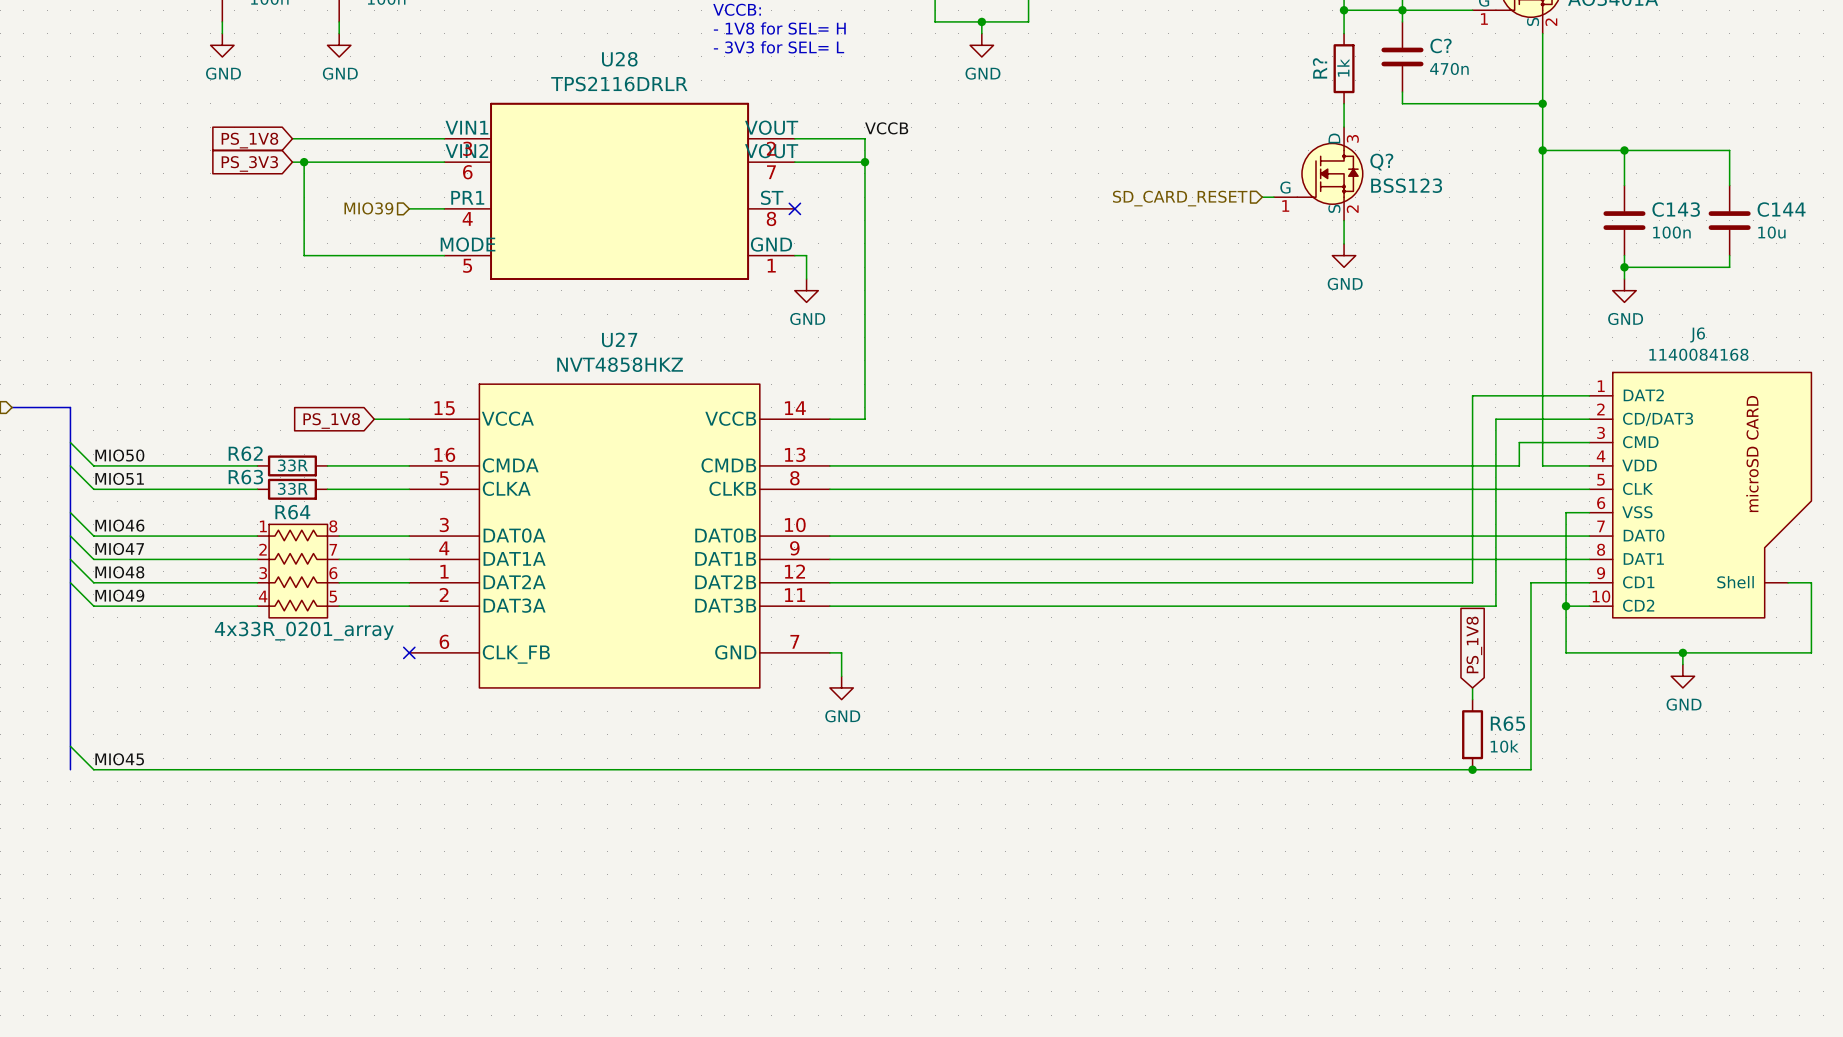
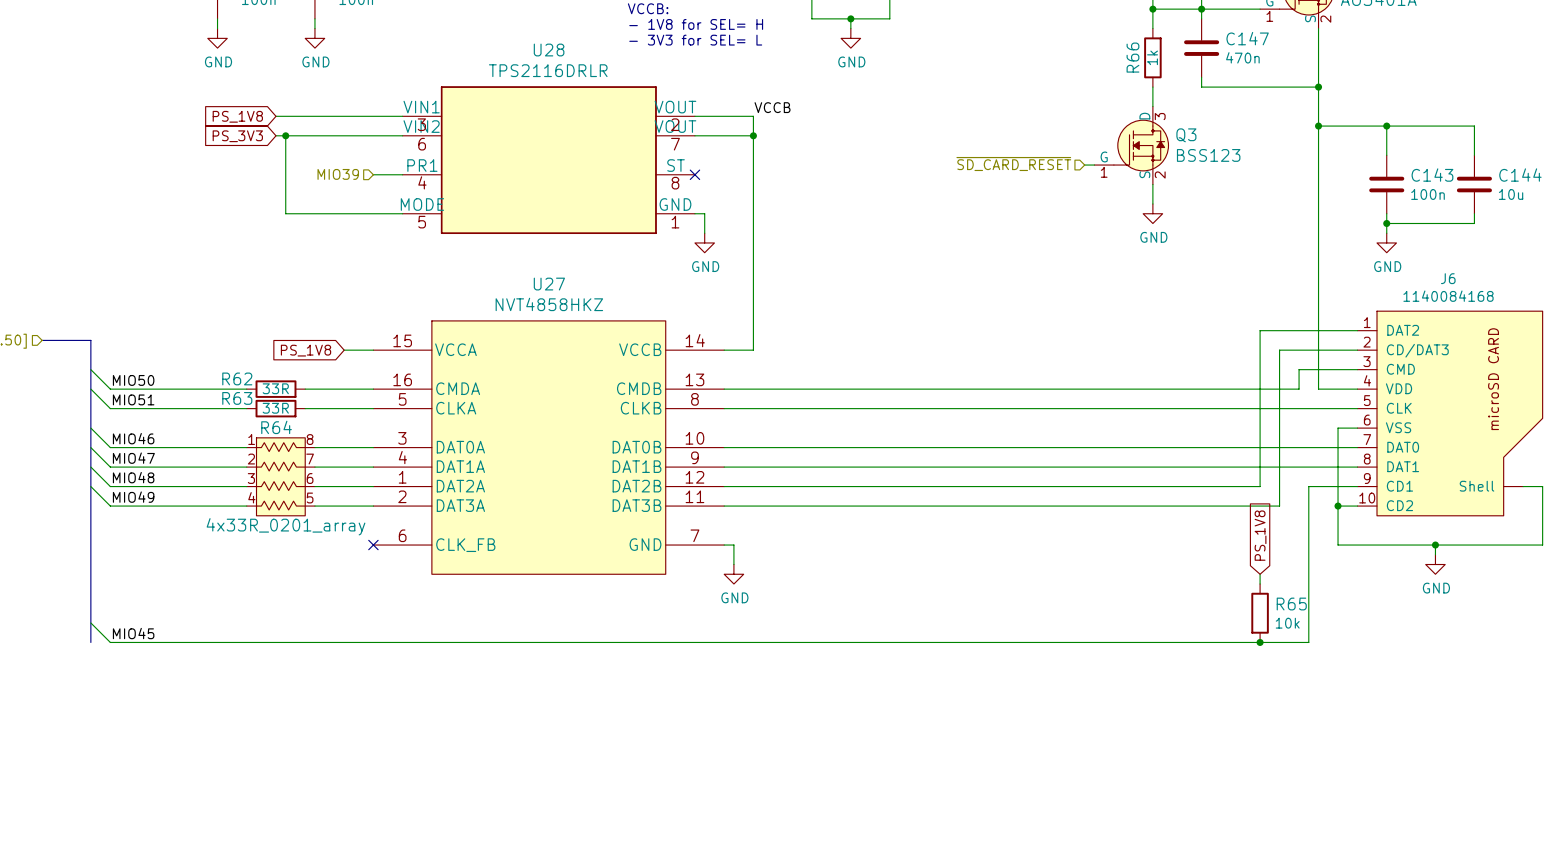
C? name: C? (1441, 45) -> C147 (1247, 38)
R? name: R? (1320, 68) -> R66 (1132, 57)
Q? name: Q? (1381, 162) -> Q3 (1186, 135)
hierarchical label: SD_CARD_RESET (1180, 198) -> ~{SD_CARD_RESET} (1013, 164)

